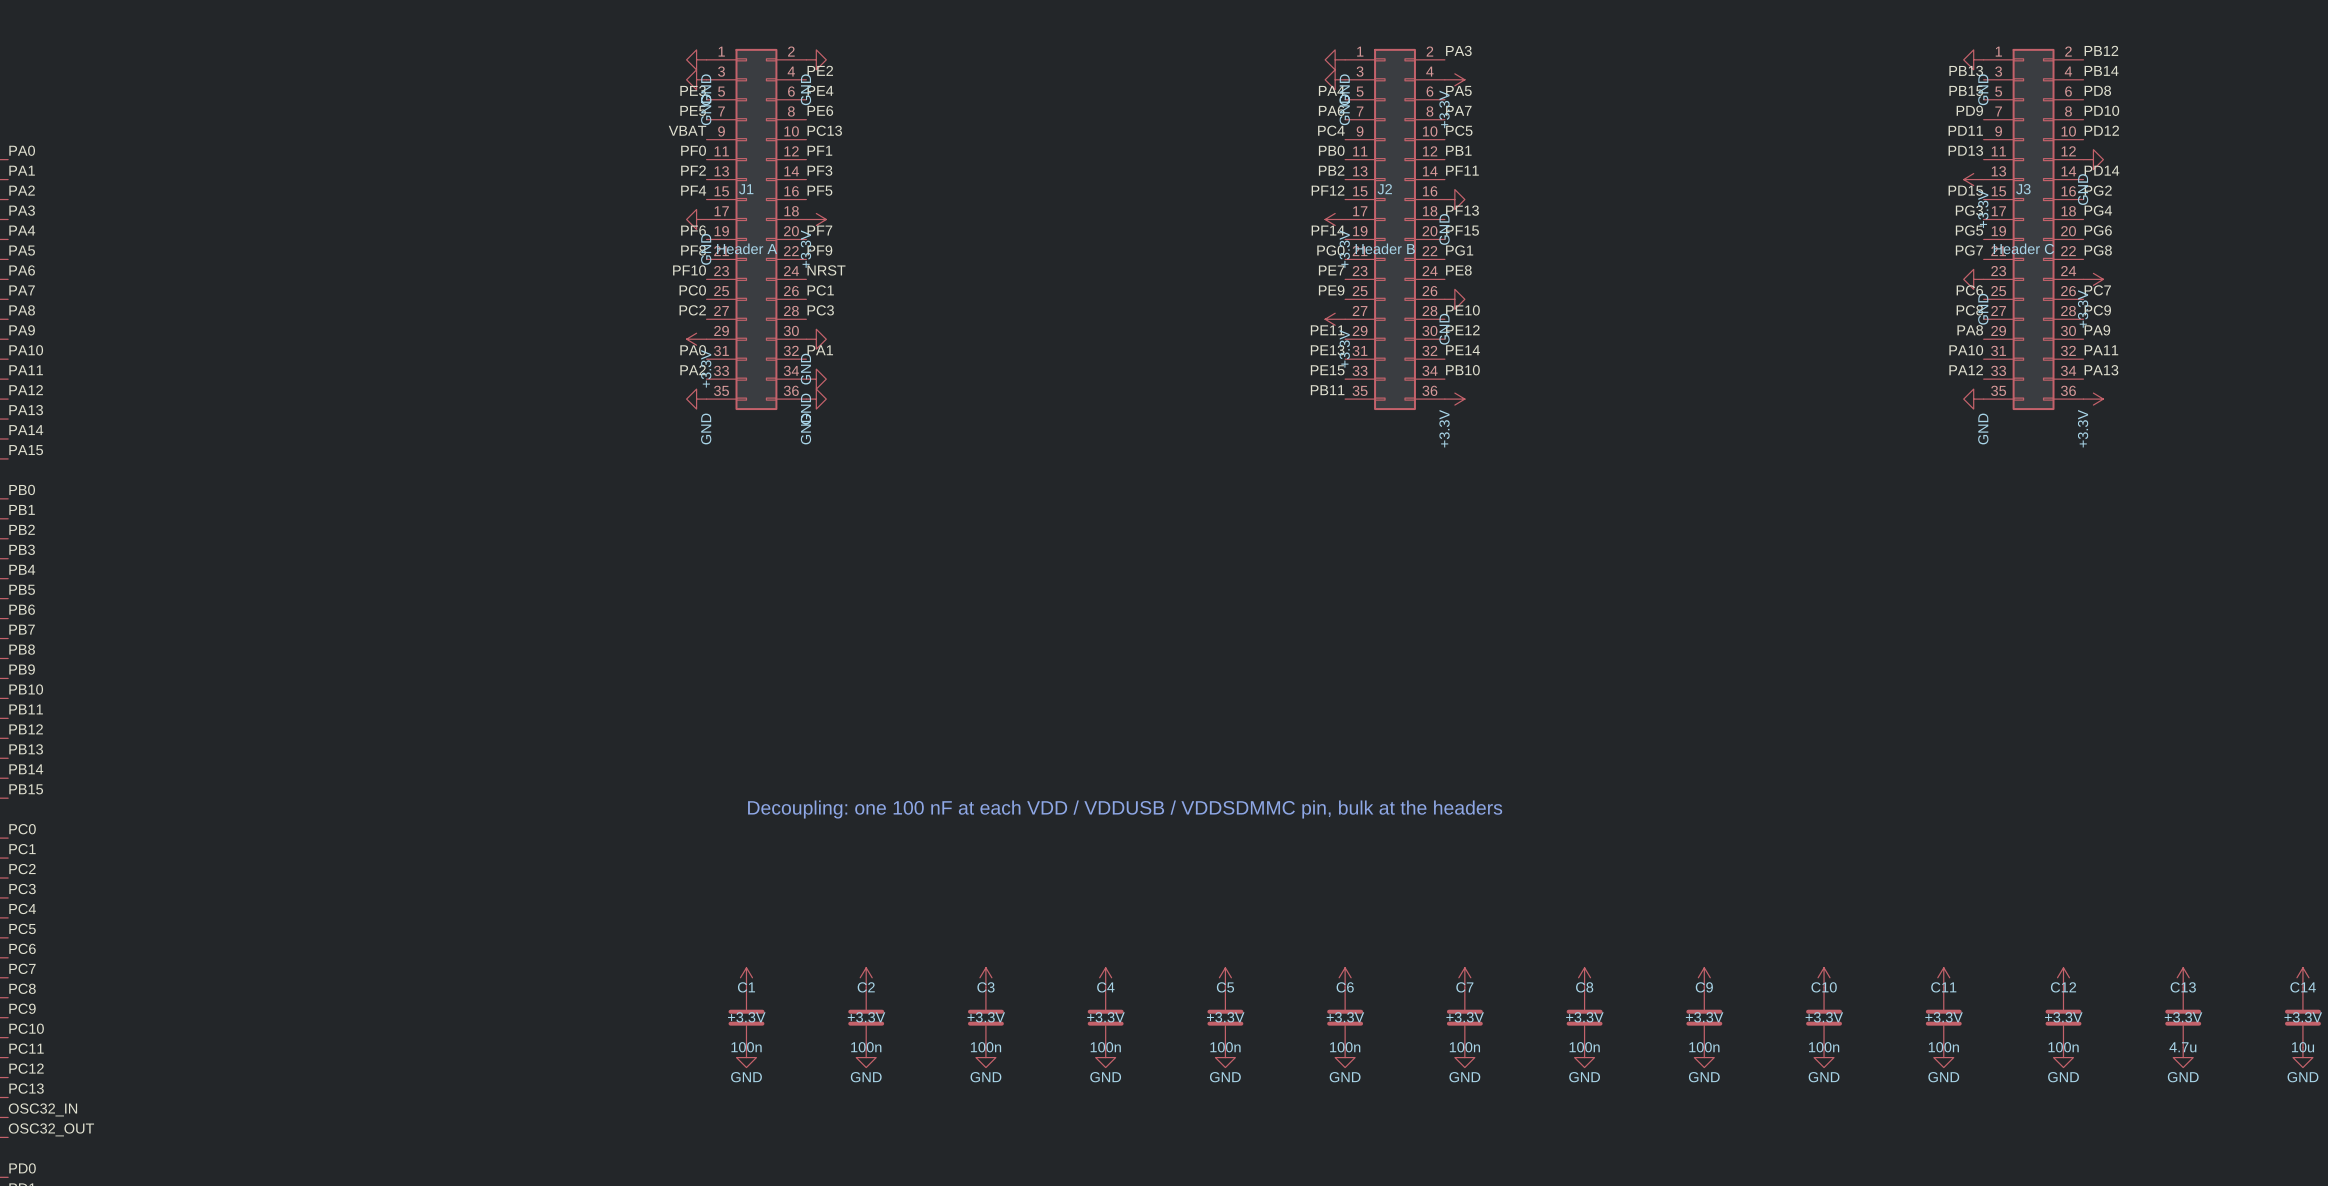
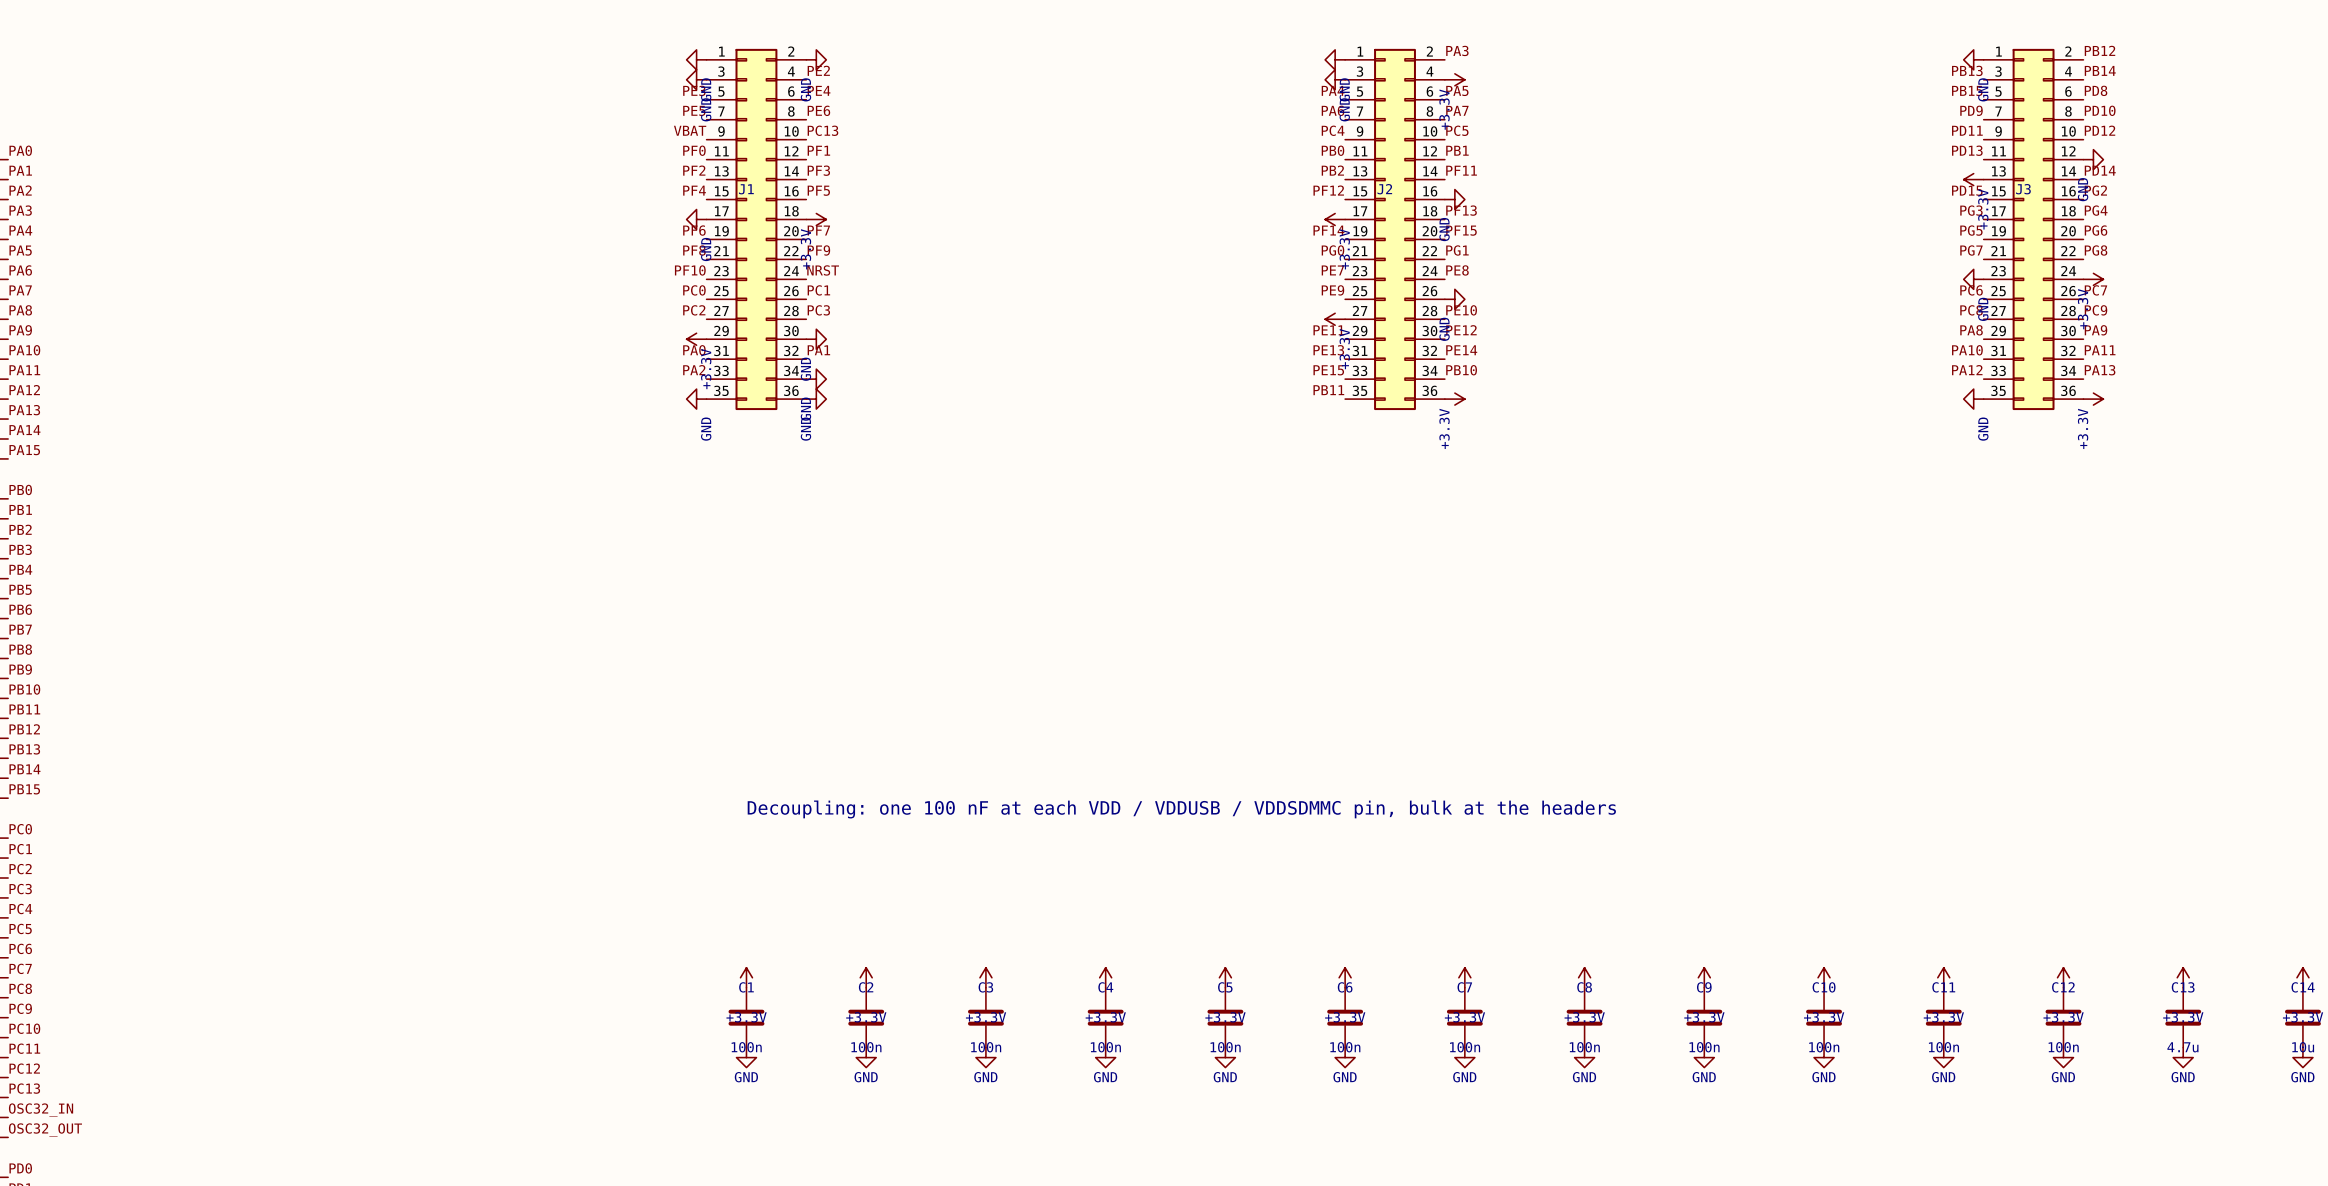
J1 value: Header A (747, 248) -> none
J2 value: Header B (1385, 248) -> none
J3 value: Header C (2023, 248) -> none

